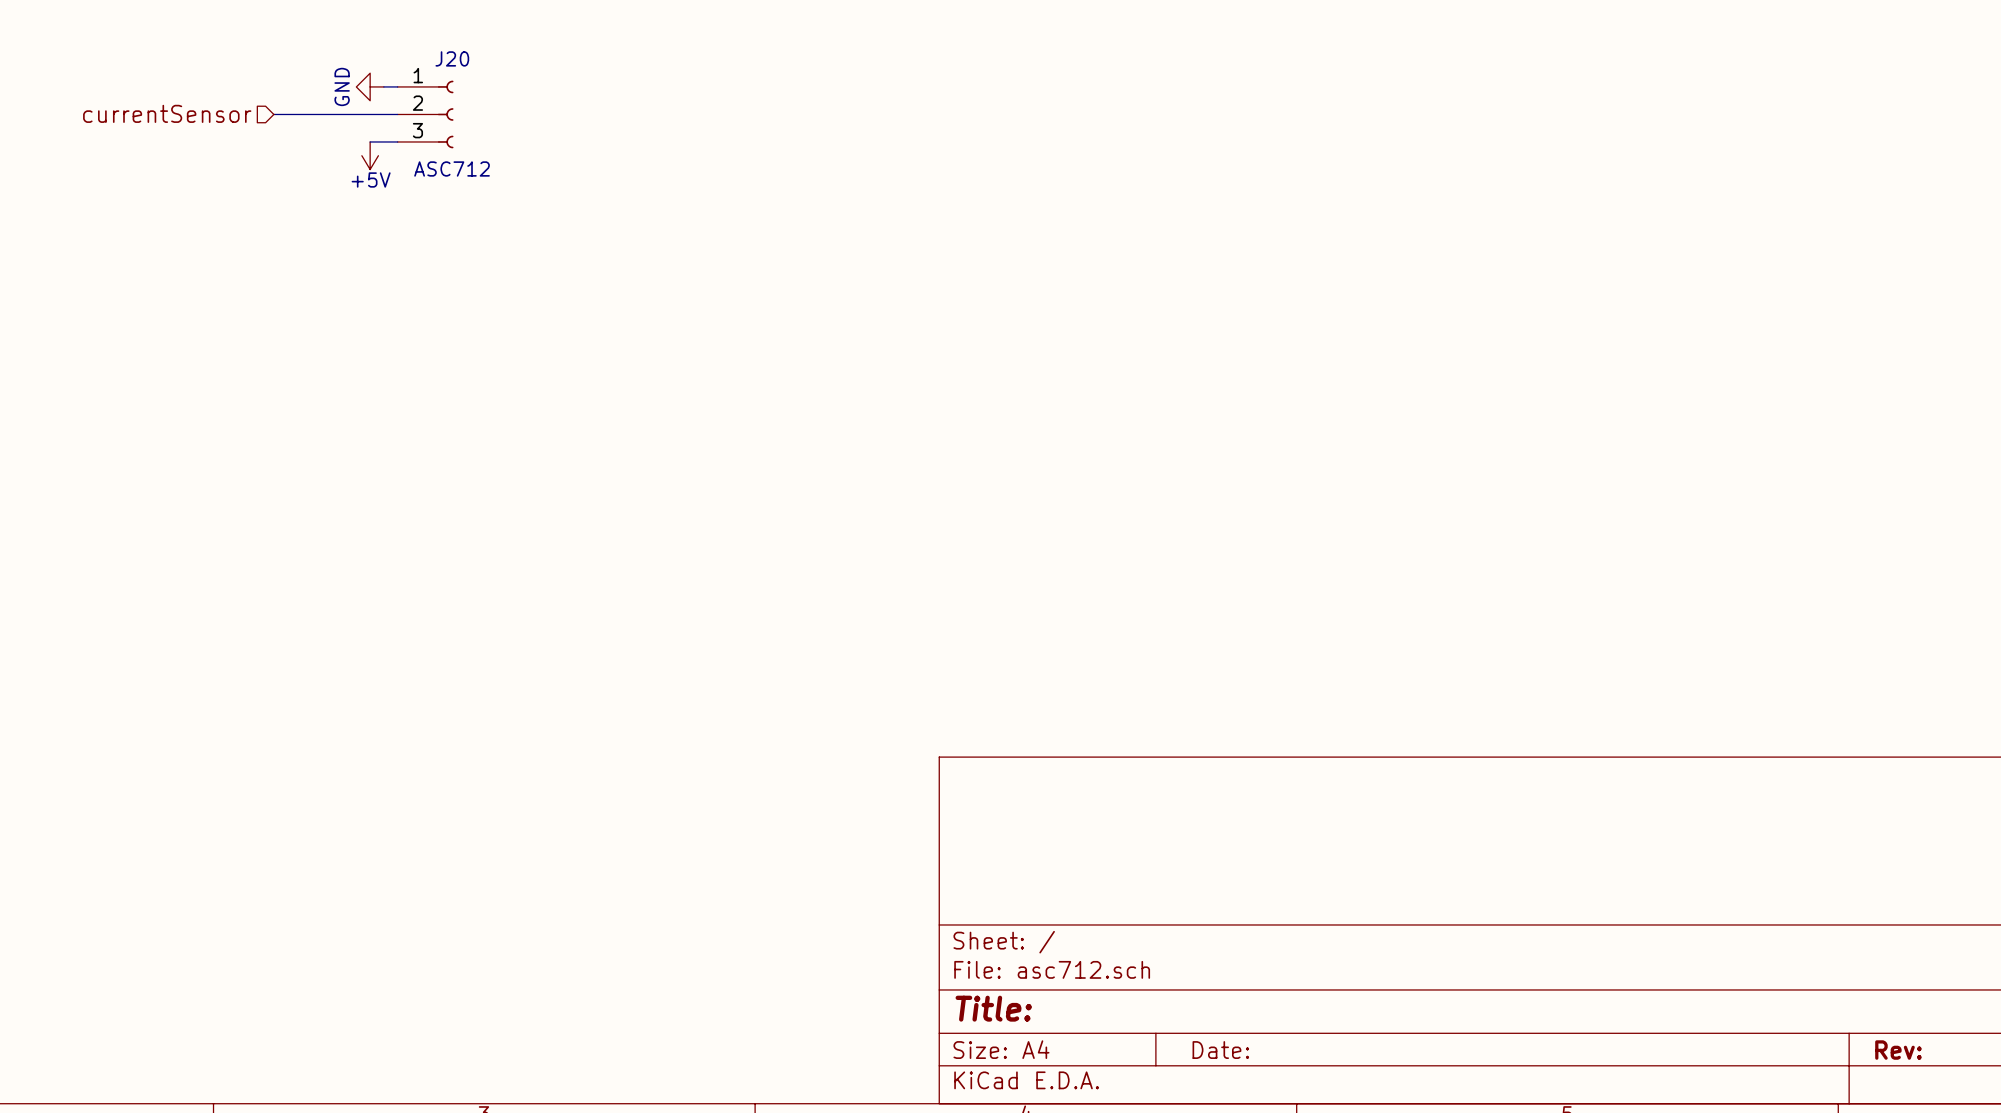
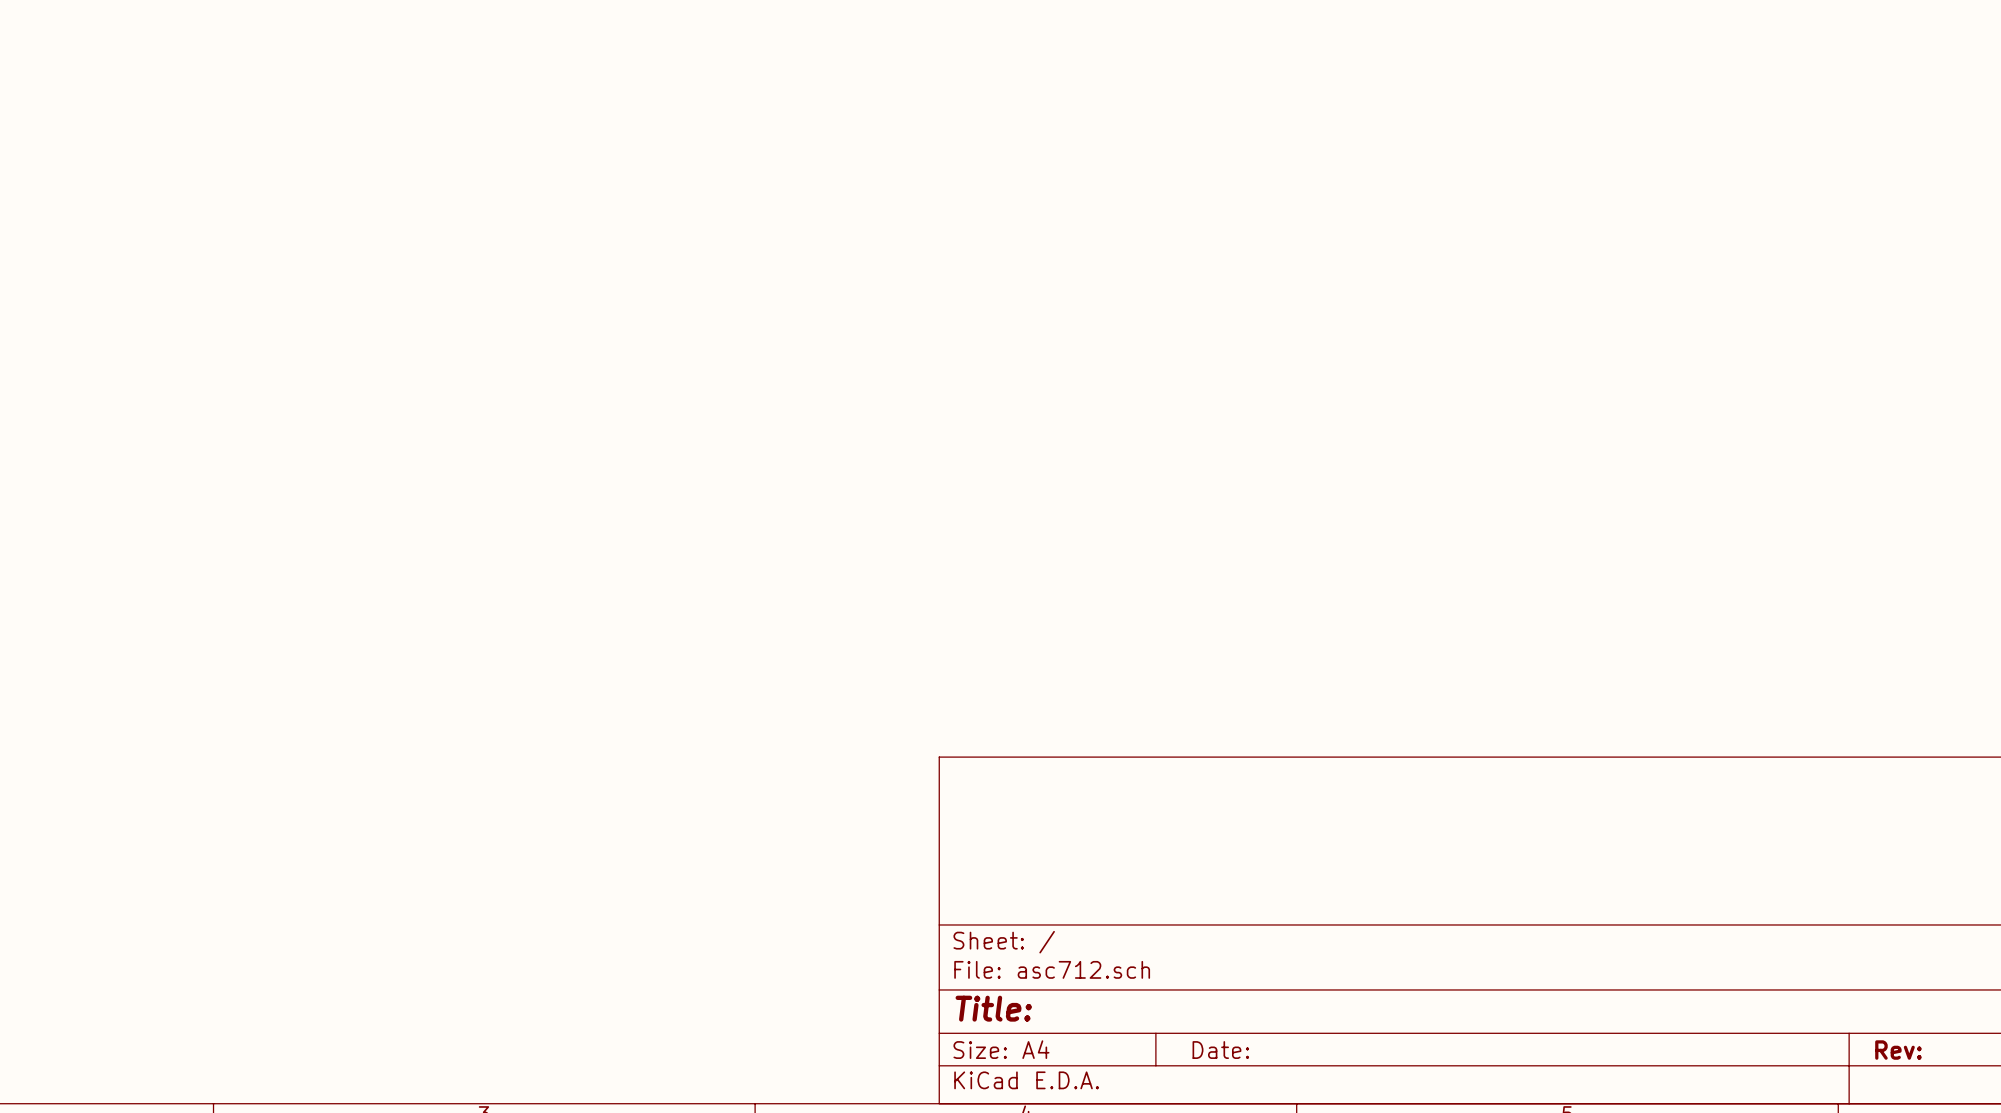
power symbol: GND (370, 86) -> none
wire: (383, 86) (397, 86) -> none
hierarchical label: currentSensor (167, 113) -> none
wire: (273, 114) (397, 114) -> none
J20: ASC712 (425, 114) -> none
wire: (370, 141) (397, 141) -> none
power symbol: +5V (370, 155) -> none

